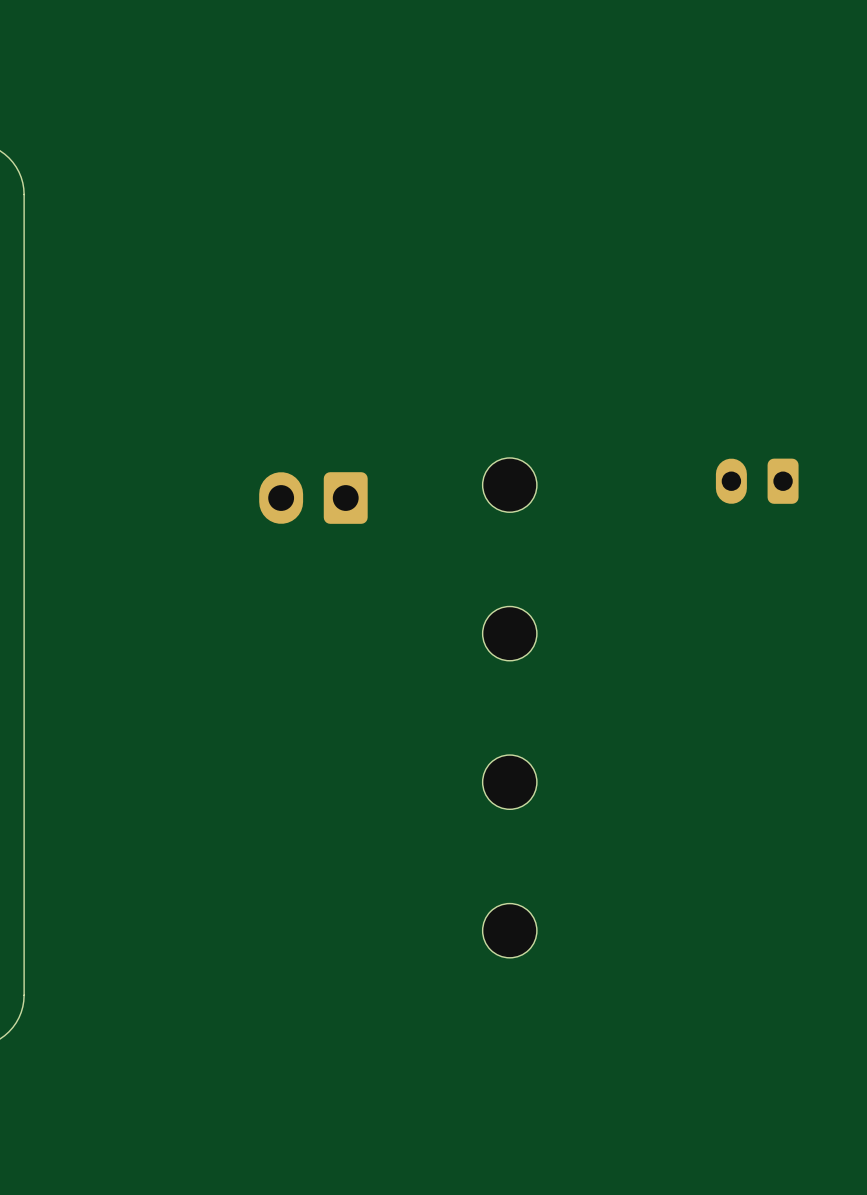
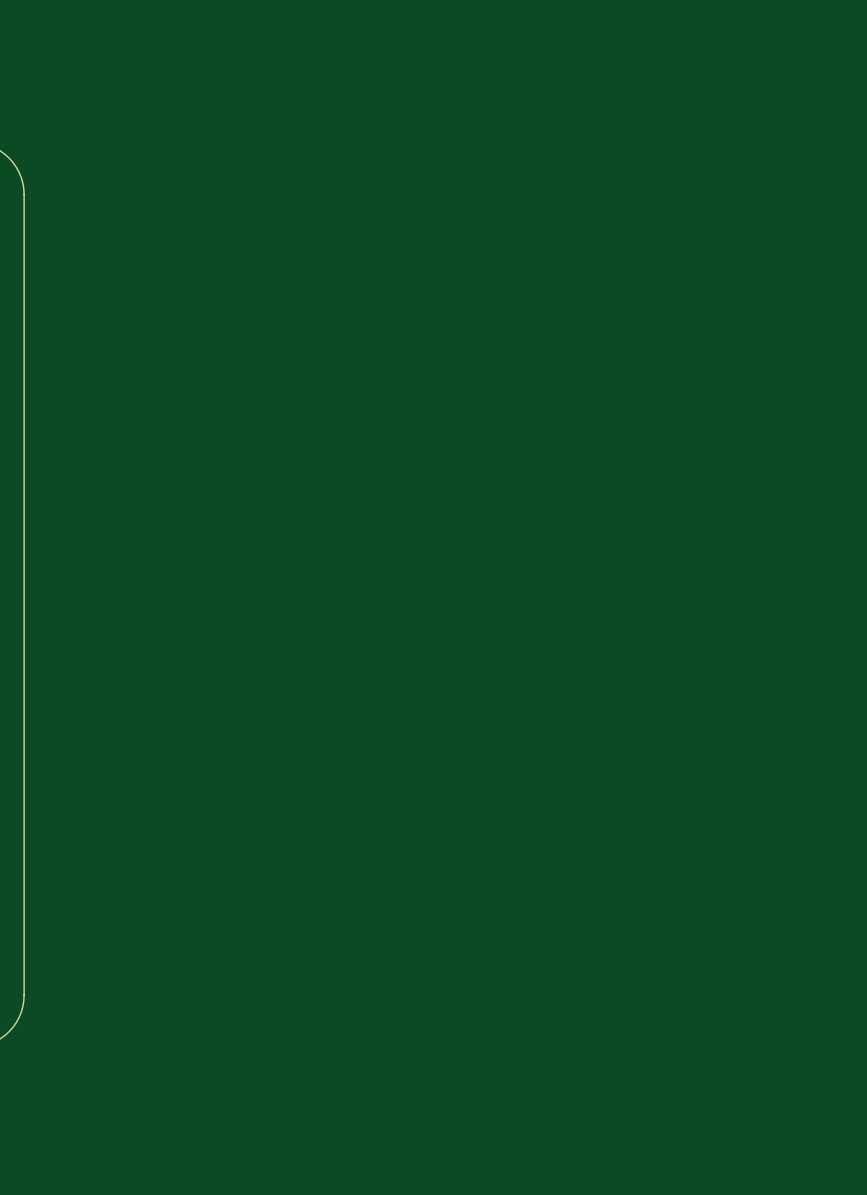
part: (757, 481) -> none
part: (509, 485) -> none
part: (313, 498) -> none
part: (509, 633) -> none
part: (509, 782) -> none
part: (509, 930) -> none

